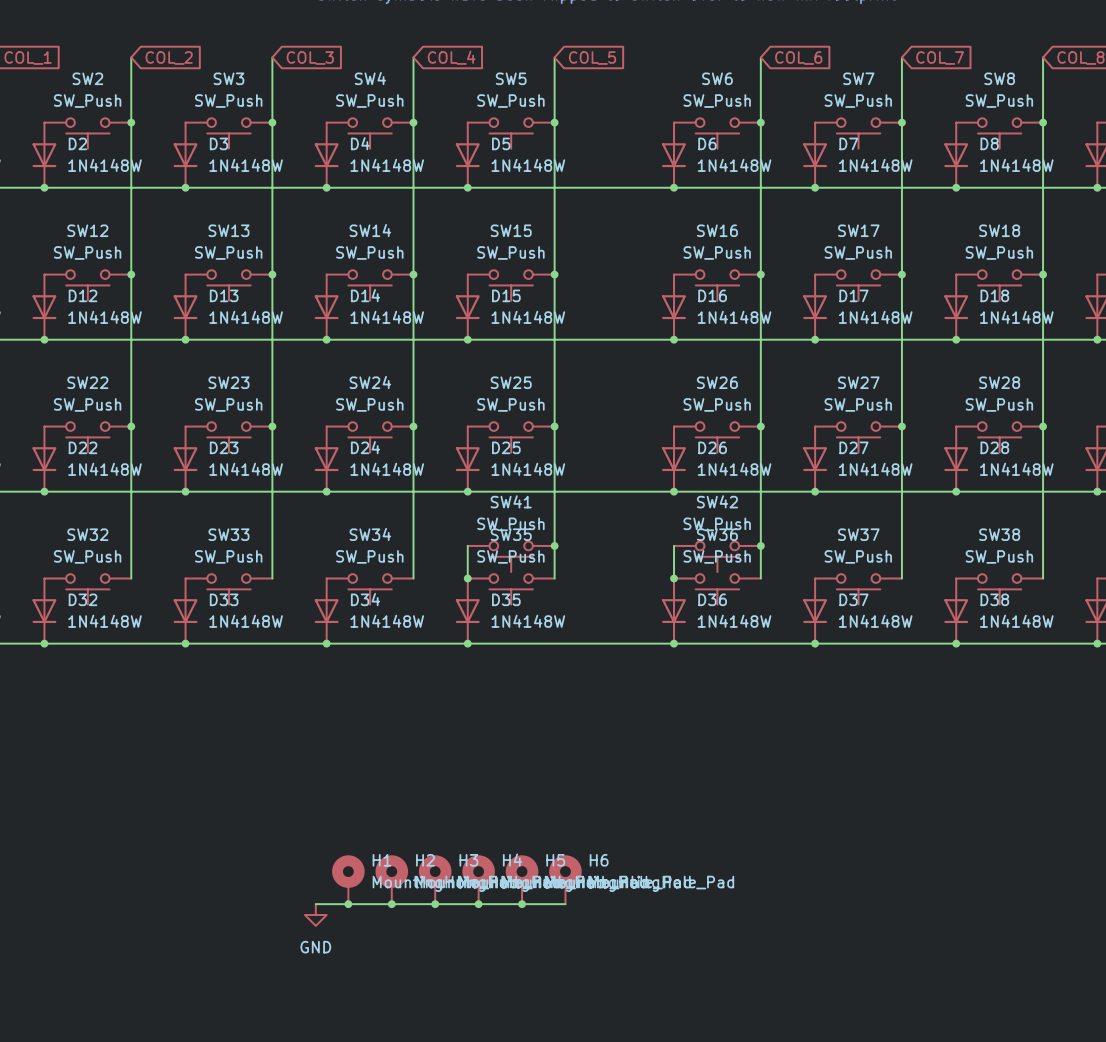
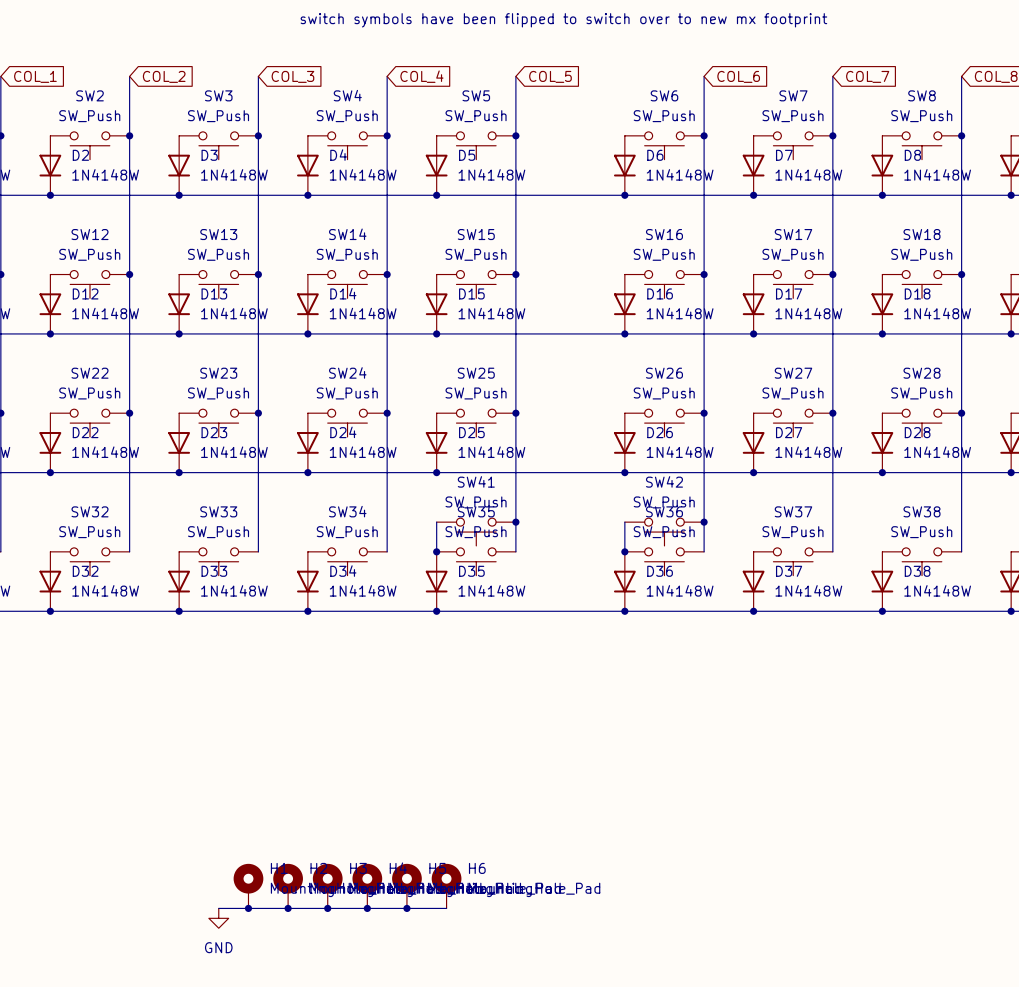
H1 position: (348, 879) -> (248, 886)
H2 position: (391, 879) -> (288, 886)
H3 position: (435, 879) -> (327, 886)
H4 position: (478, 879) -> (367, 886)
H5 position: (522, 879) -> (406, 886)
H6 position: (565, 879) -> (446, 886)
wire: (315, 904) (565, 904) -> (218, 908) (446, 908)
junction: (348, 904) -> none
junction: (391, 904) -> none
junction: (435, 904) -> none
junction: (478, 904) -> none
junction: (522, 904) -> none
power symbol position: GND (315, 915) -> GND (218, 918)
junction: none -> (248, 908)
junction: none -> (288, 908)
junction: none -> (327, 908)
junction: none -> (367, 908)
junction: none -> (406, 908)

